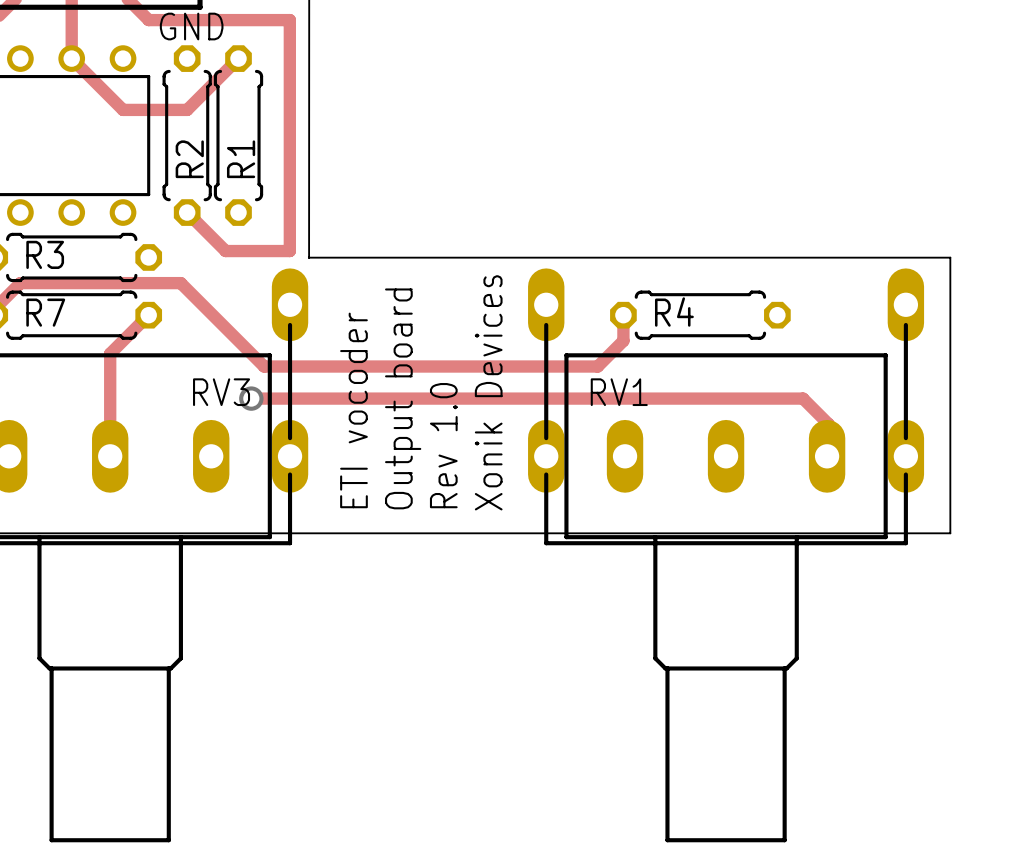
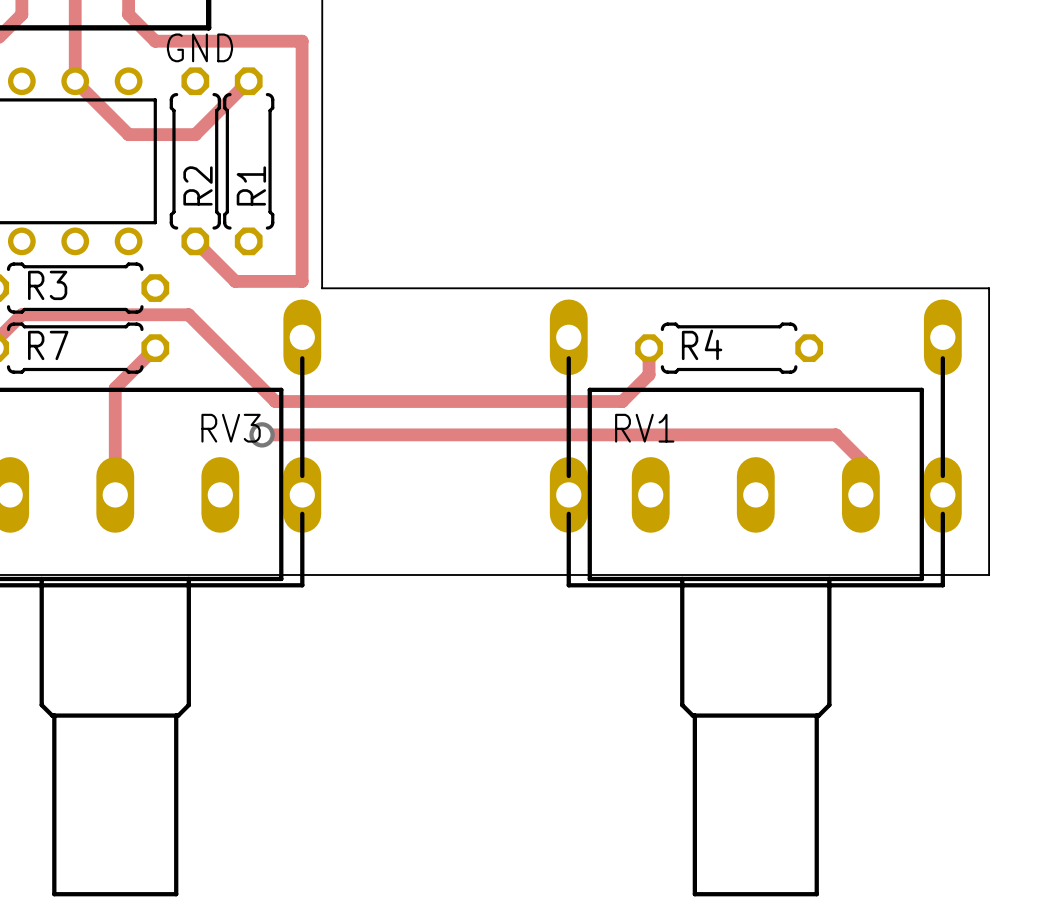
text: Xonik Devices (488, 392) -> none
text: Output board (403, 398) -> none
text: ETI vocoder (353, 410) -> none
text: Rev 1.0 (443, 445) -> none

